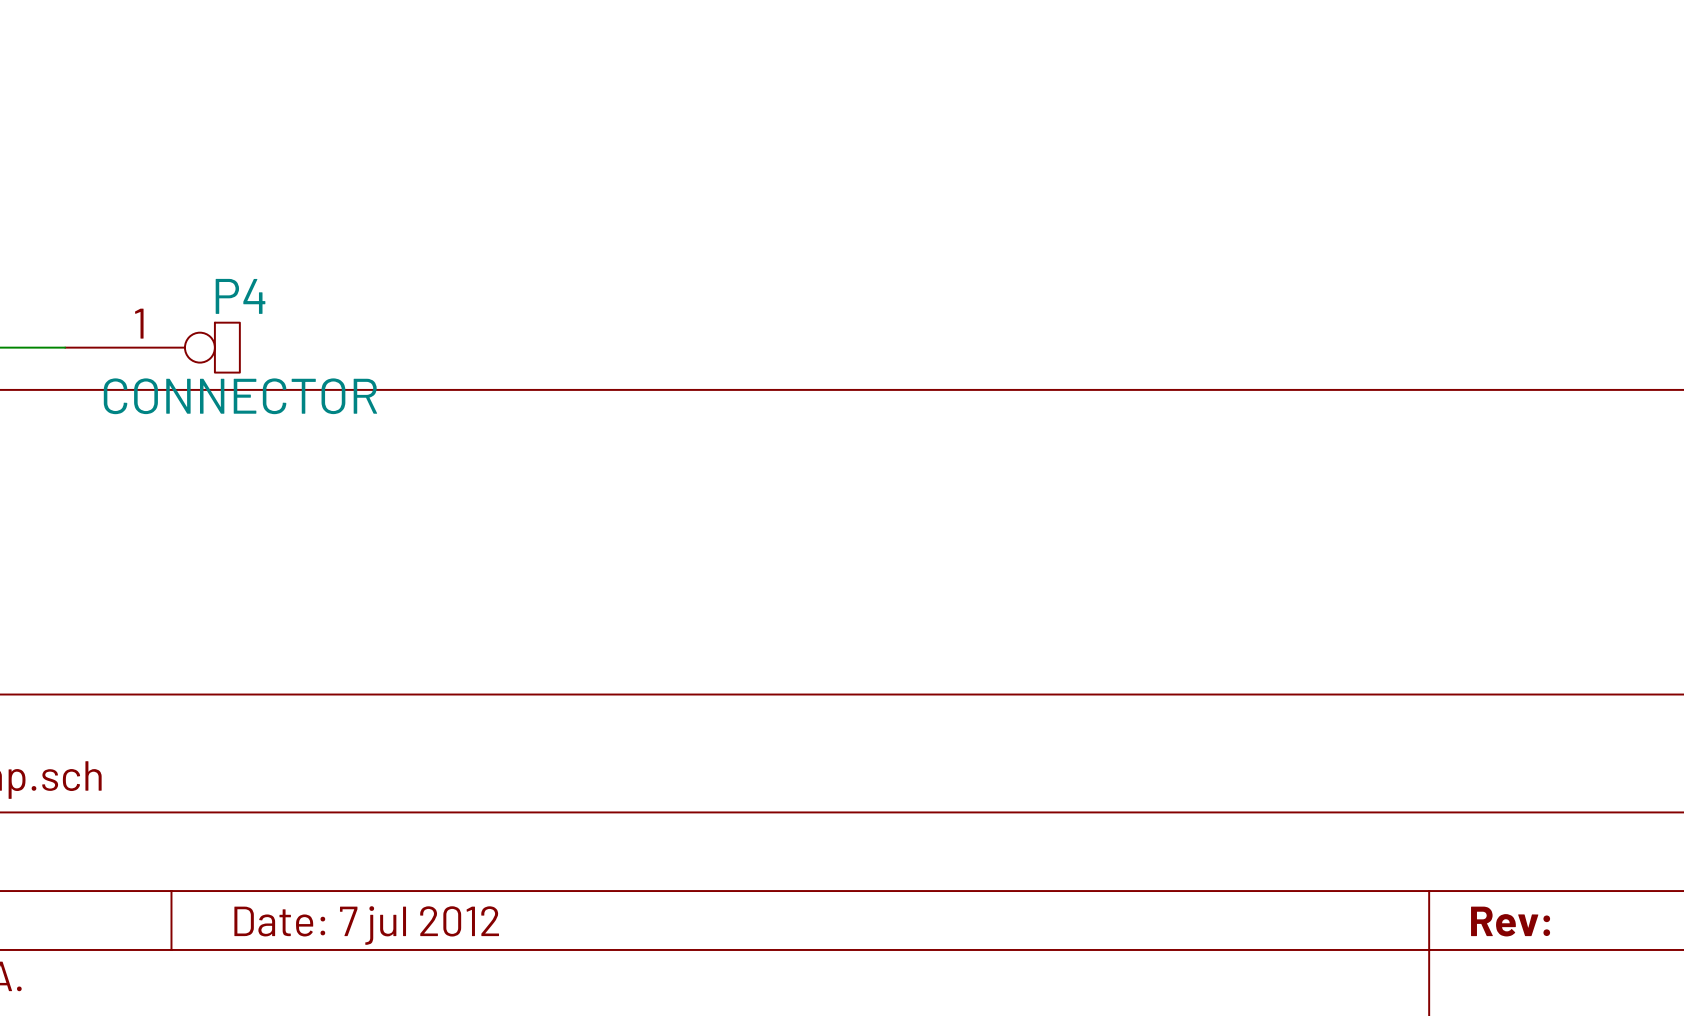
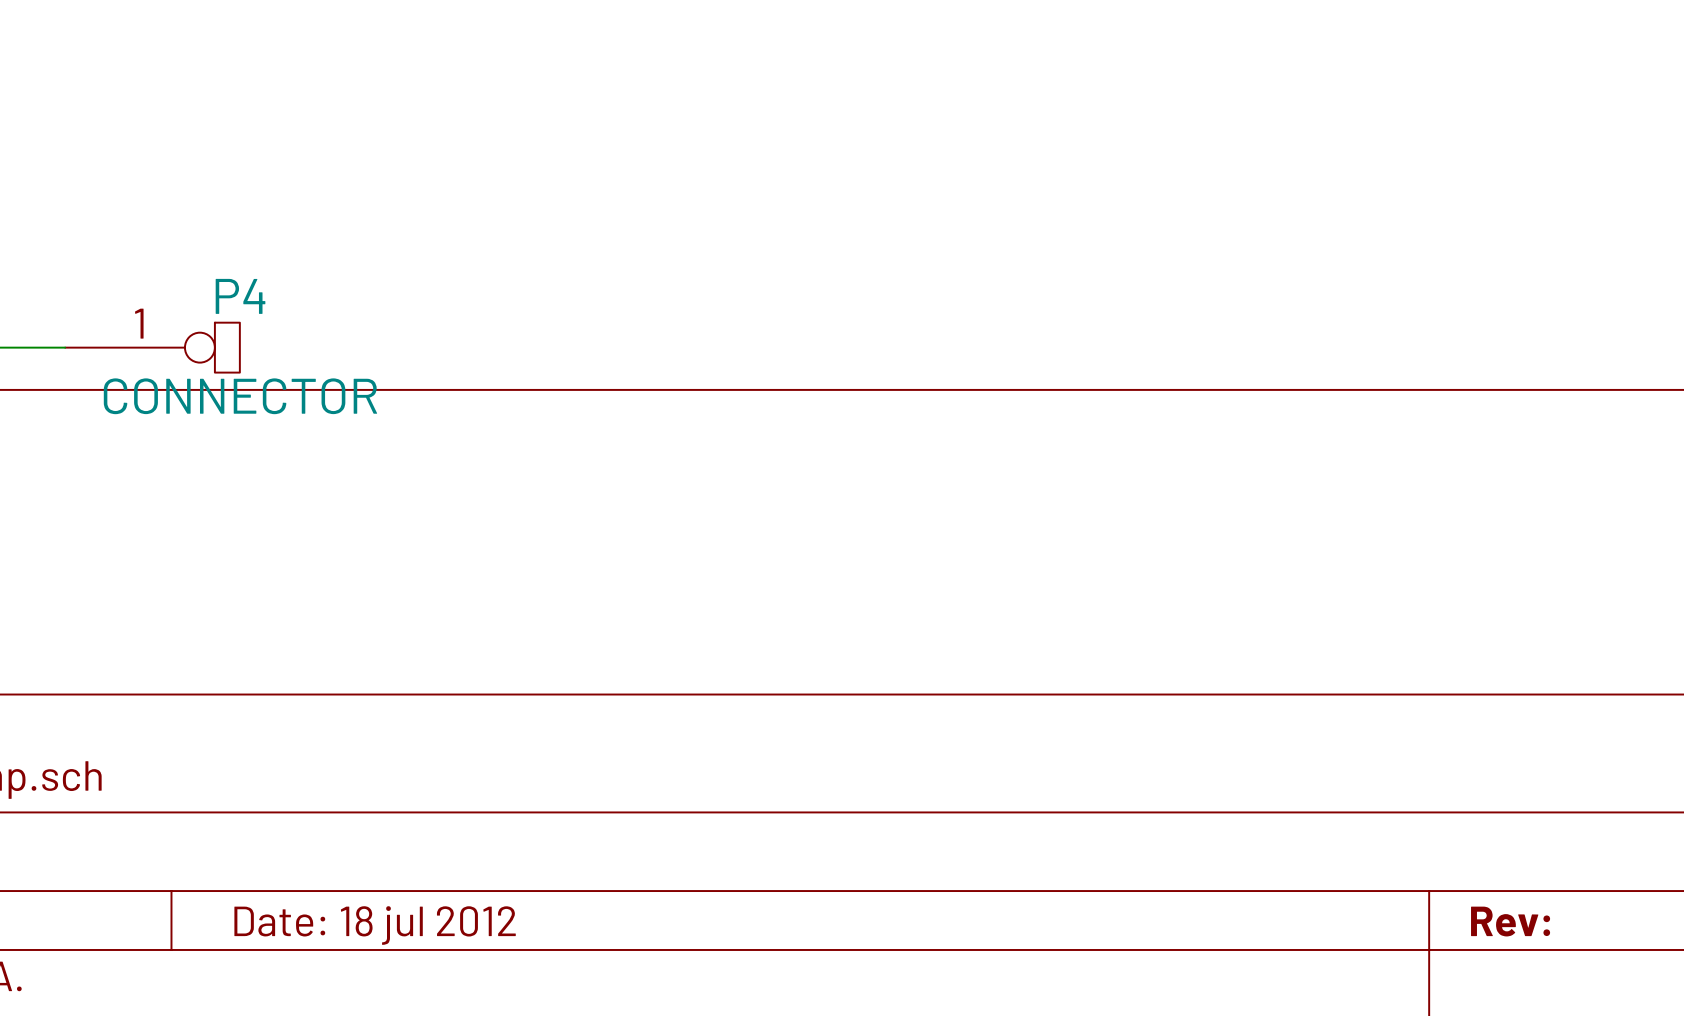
title block: Date: 7 jul 2012 (366, 925) -> Date: 18 jul 2012 (375, 925)

